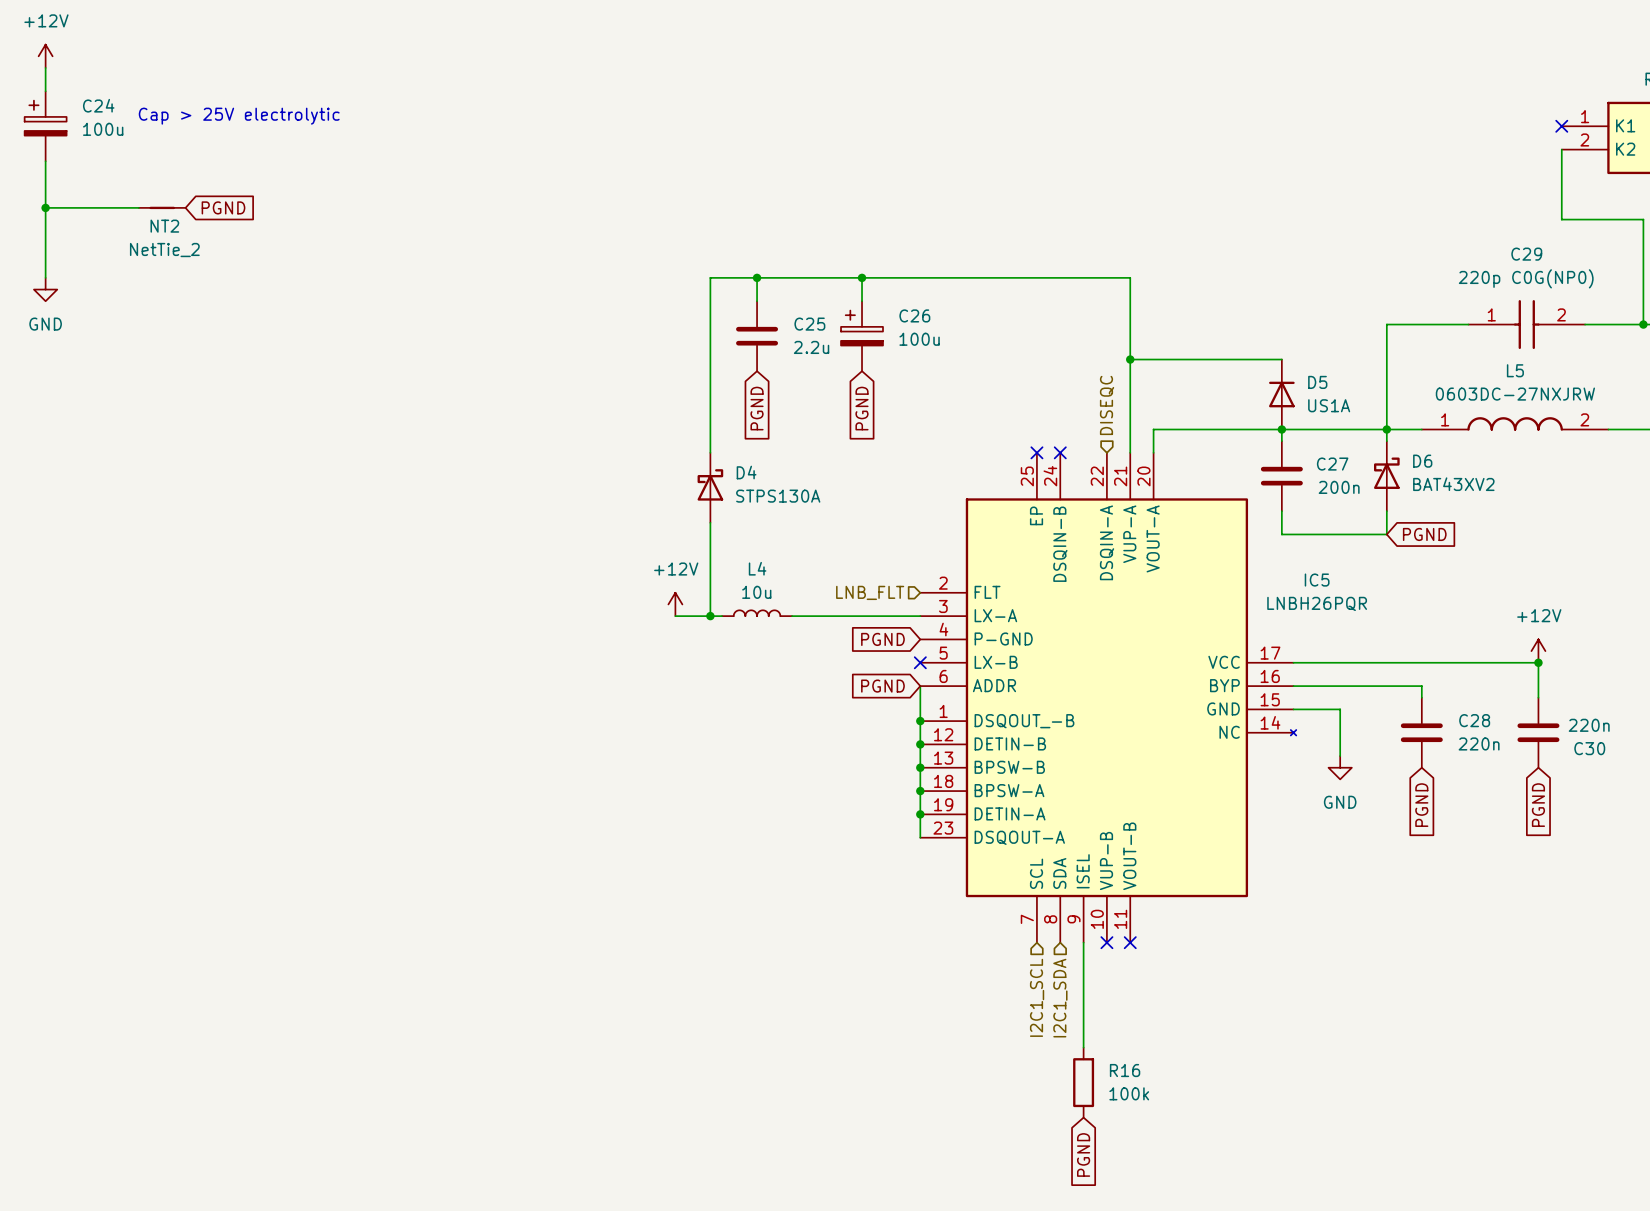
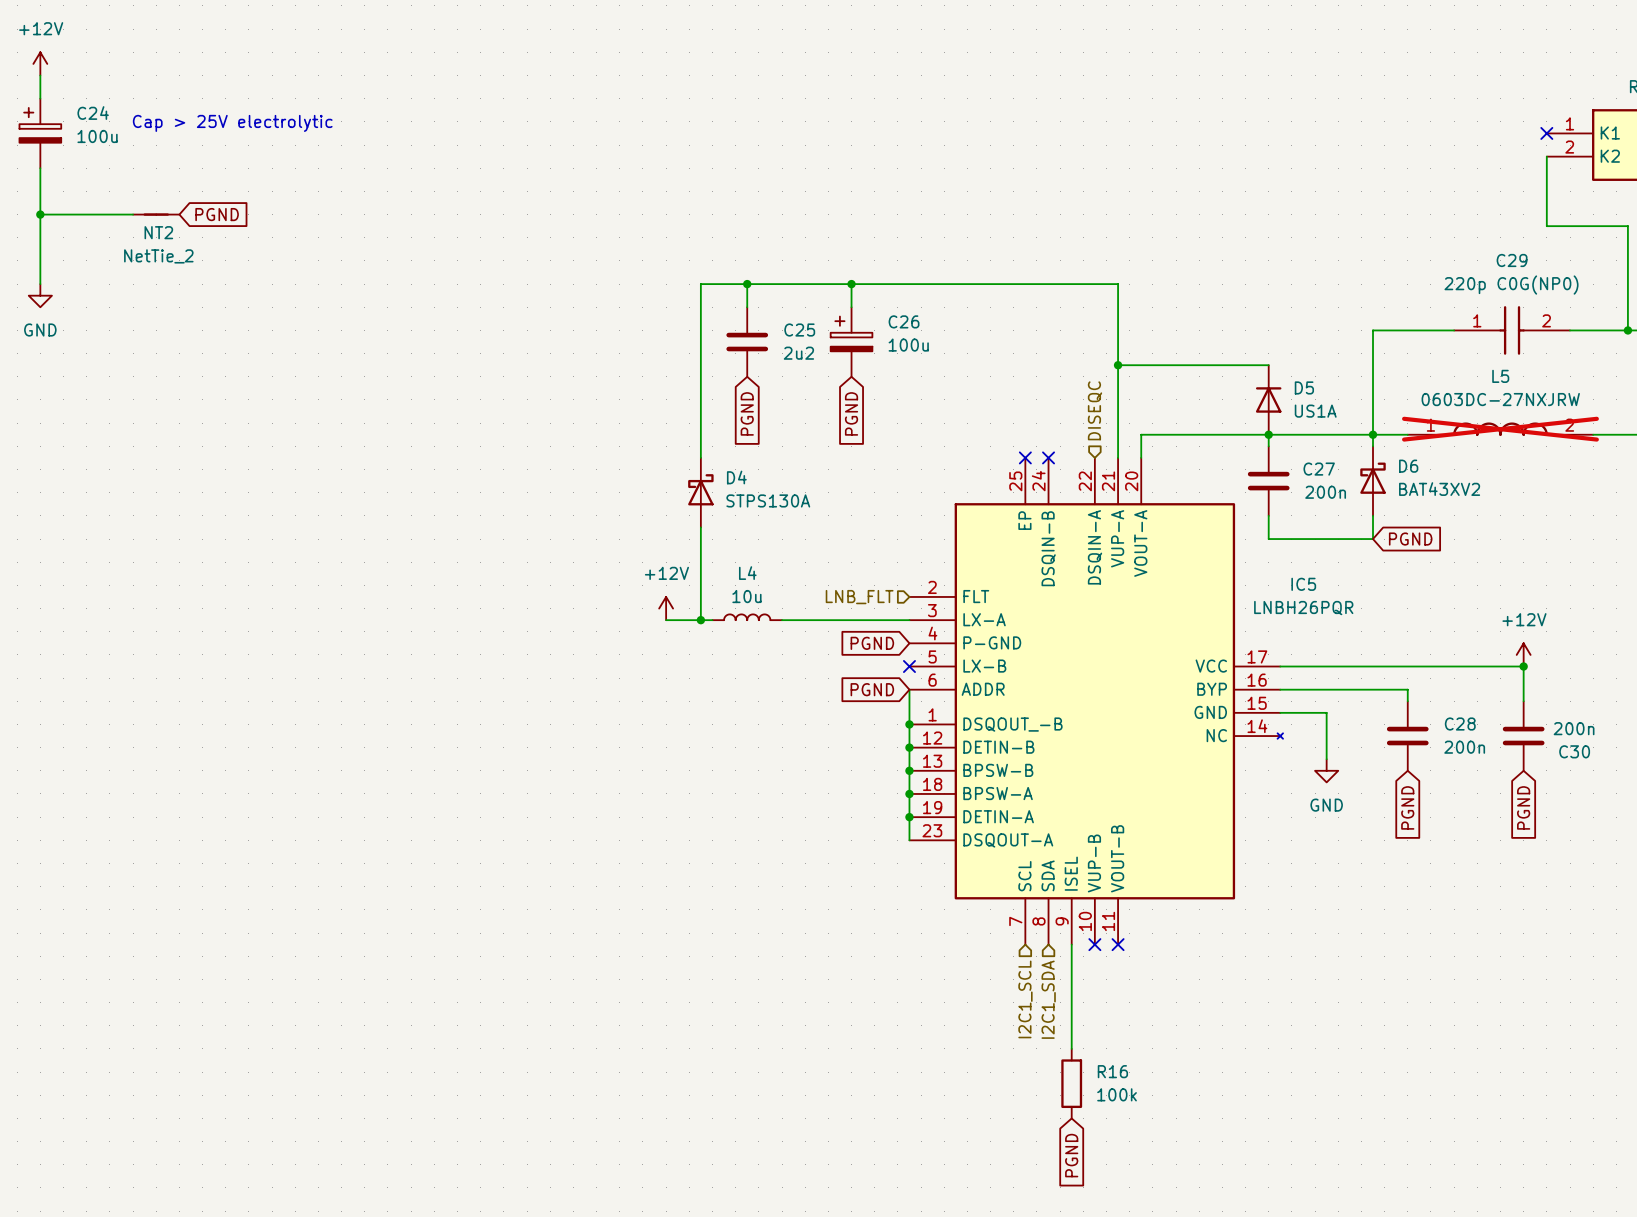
C25 value: 2.2u (811, 347) -> 2u2 (798, 353)
L5 do-not-place cross: none -> (1500, 429)
C30 value: 220n (1589, 725) -> 200n (1574, 728)
C28 value: 220n (1479, 743) -> 200n (1464, 747)

